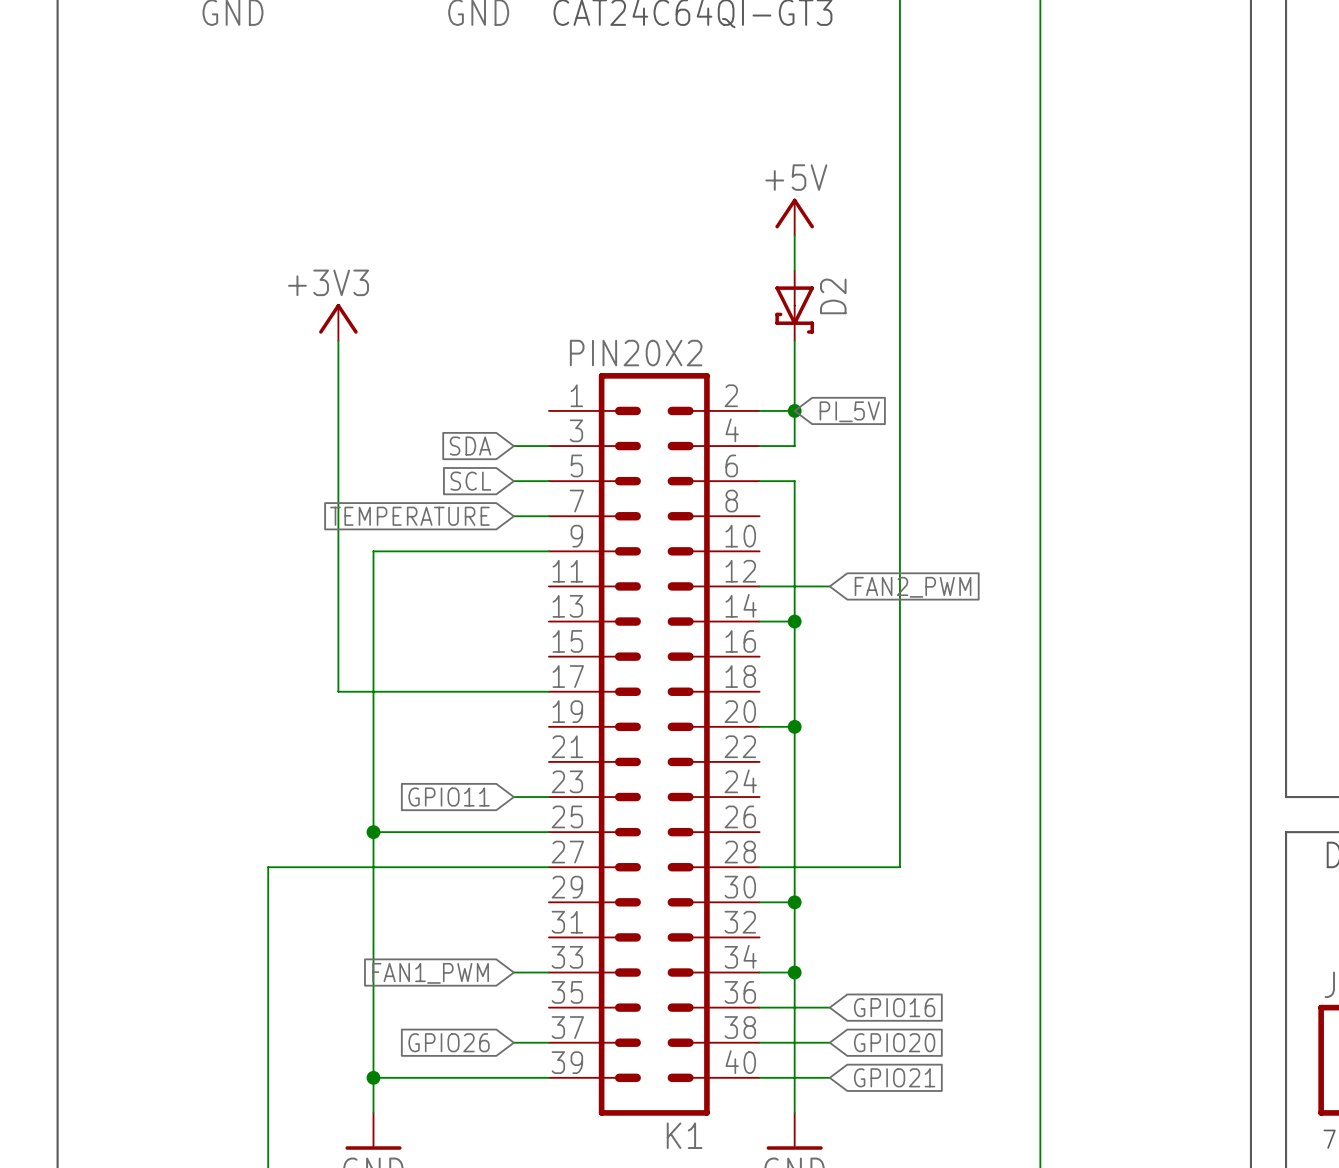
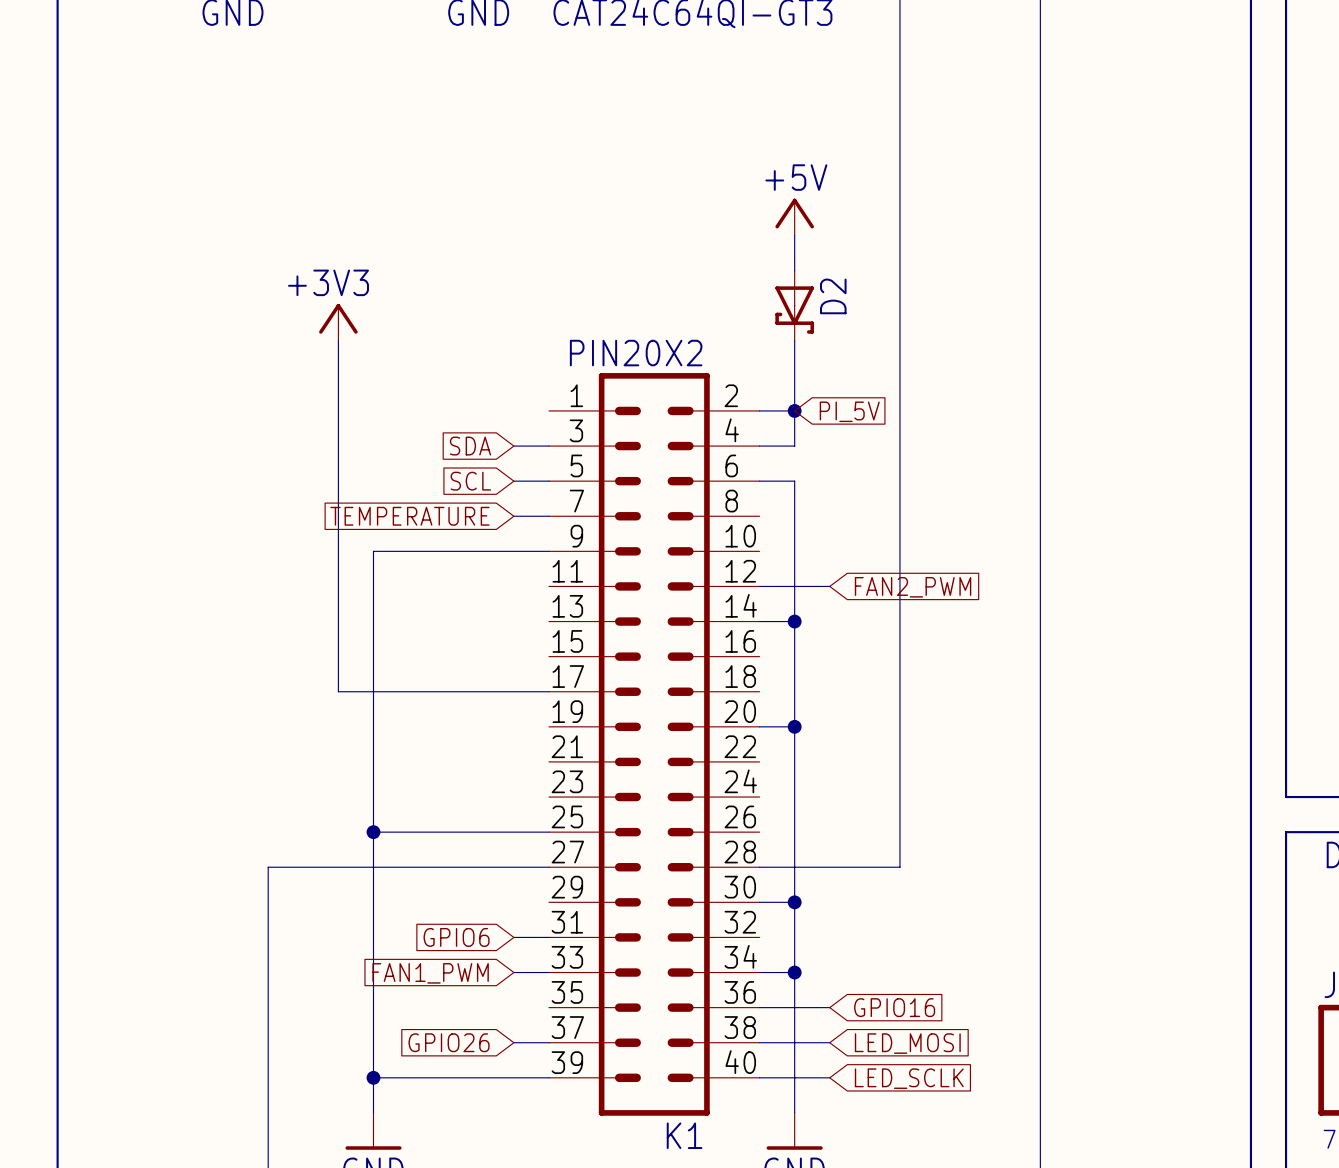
global label: GPIO11 (449, 797) -> none
wire: (513, 797) (548, 797) -> (513, 937) (548, 937)
global label: none -> GPIO6 (456, 937)
global label: GPIO20 (894, 1042) -> LED_MOSI (907, 1043)
global label: GPIO21 (894, 1077) -> LED_SCLK (909, 1078)

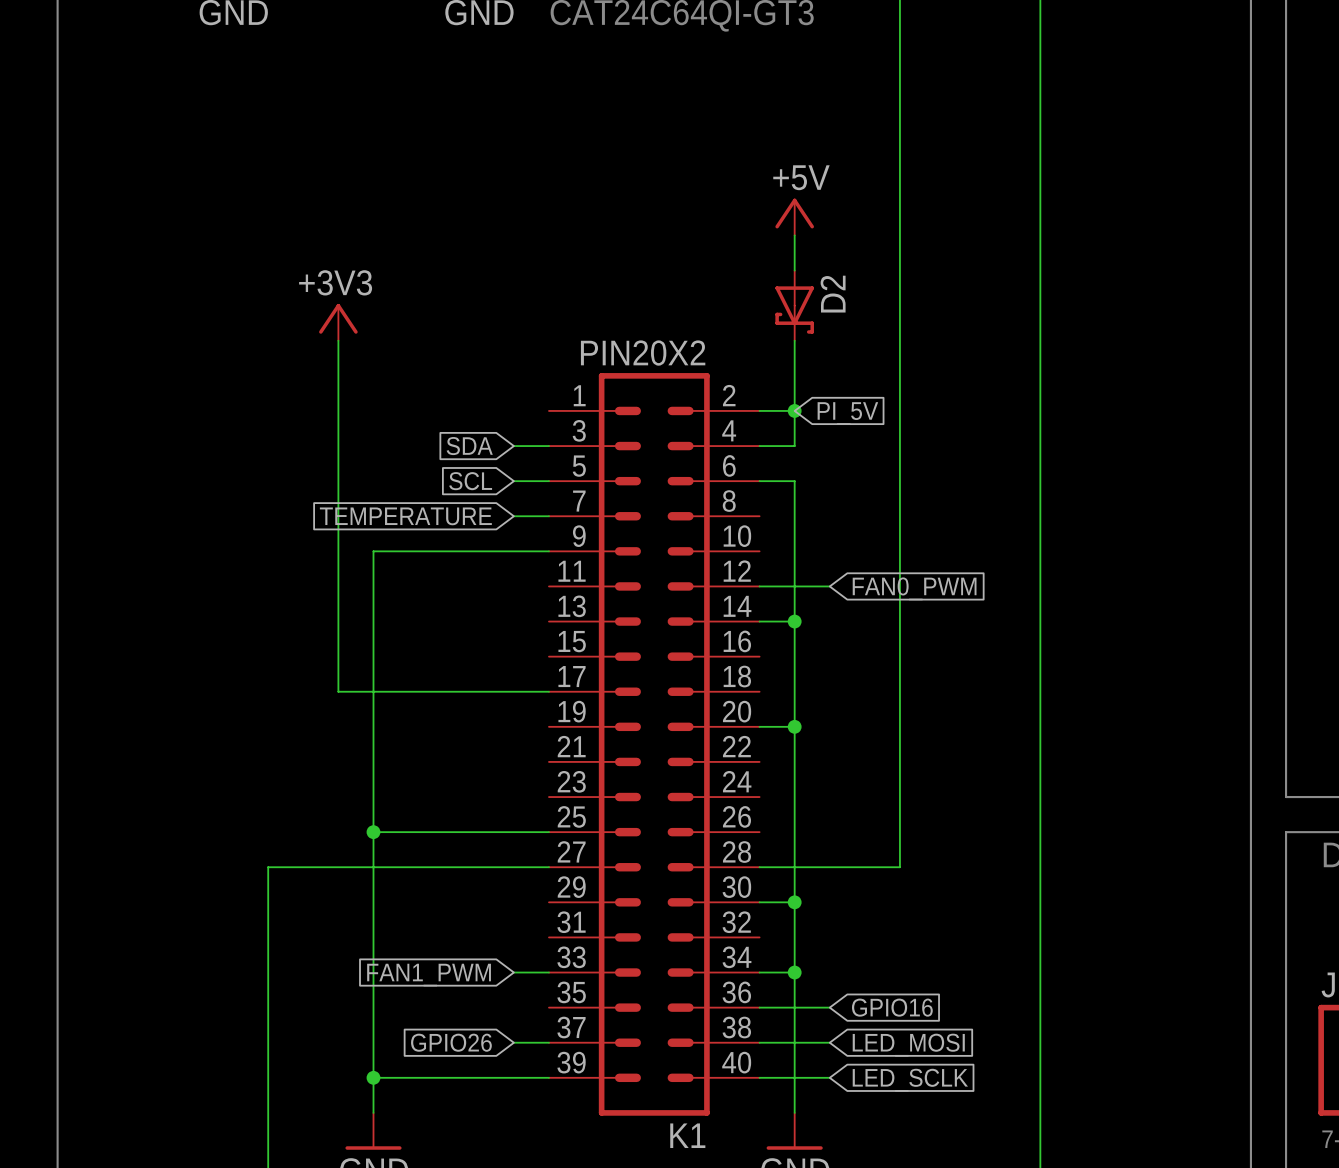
global label: FAN2_PWM (913, 587) -> FAN0_PWM (914, 588)
global label: GPIO6 (456, 937) -> none
wire: (513, 937) (548, 937) -> none

